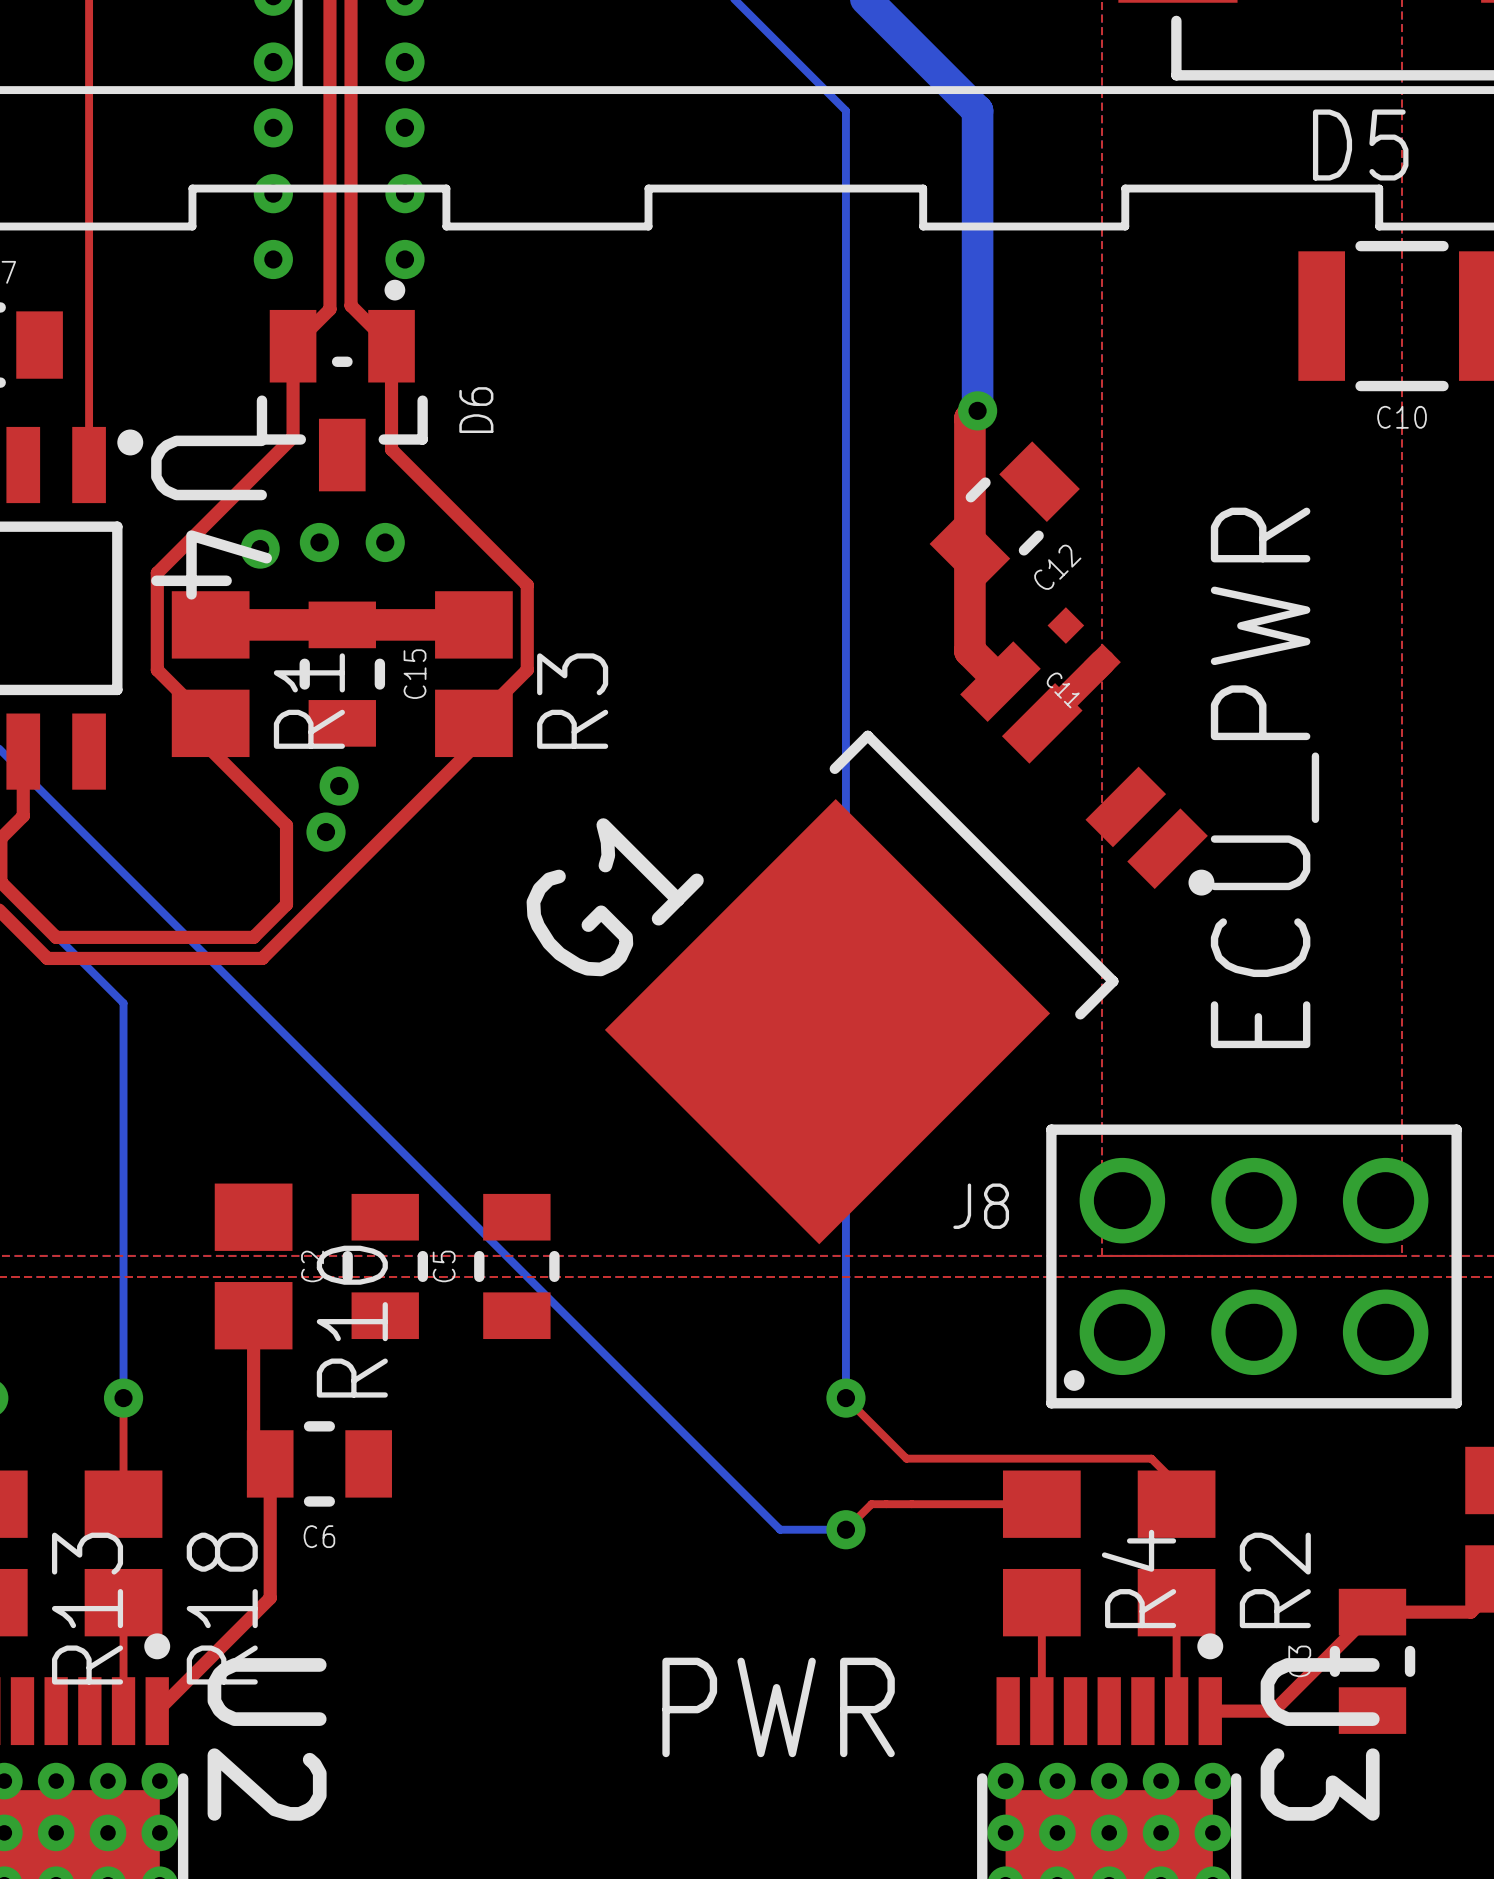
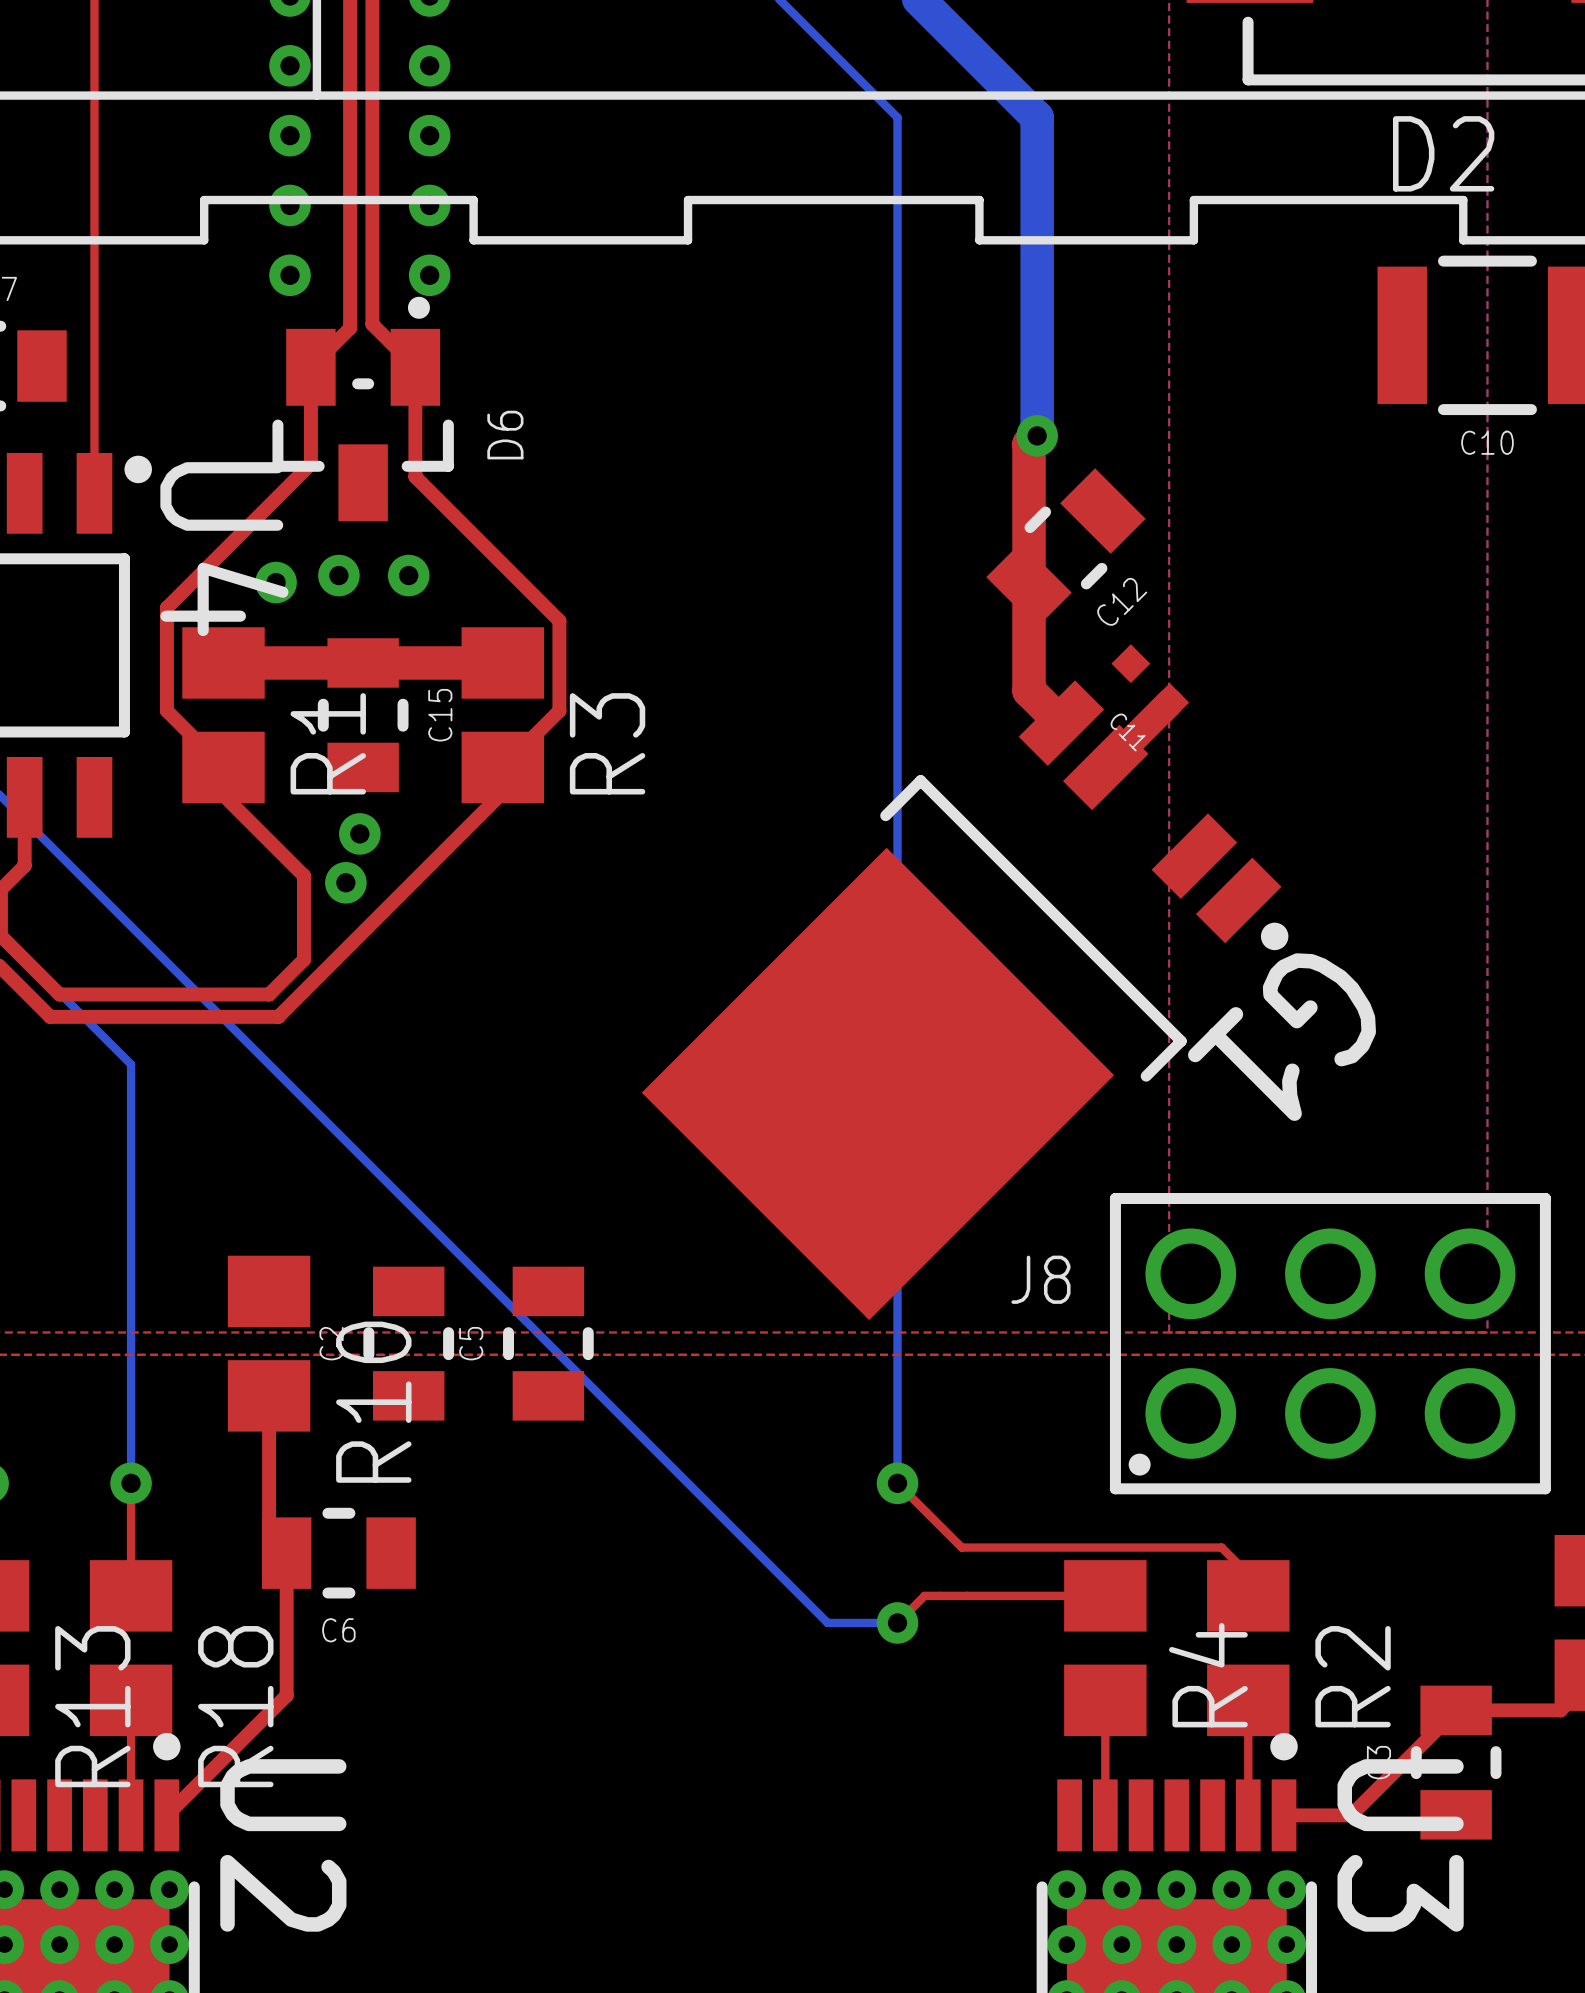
D5 name: D5 (1360, 145) -> D2 (1443, 153)
text: ECU_PWR (1264, 777) -> none
G1 name rotation: 0° (615, 897) -> 180° (1281, 1037)
G1 name position: G1 (615, 897) -> G1 (1281, 1037)
text: PWR (778, 1707) -> none

